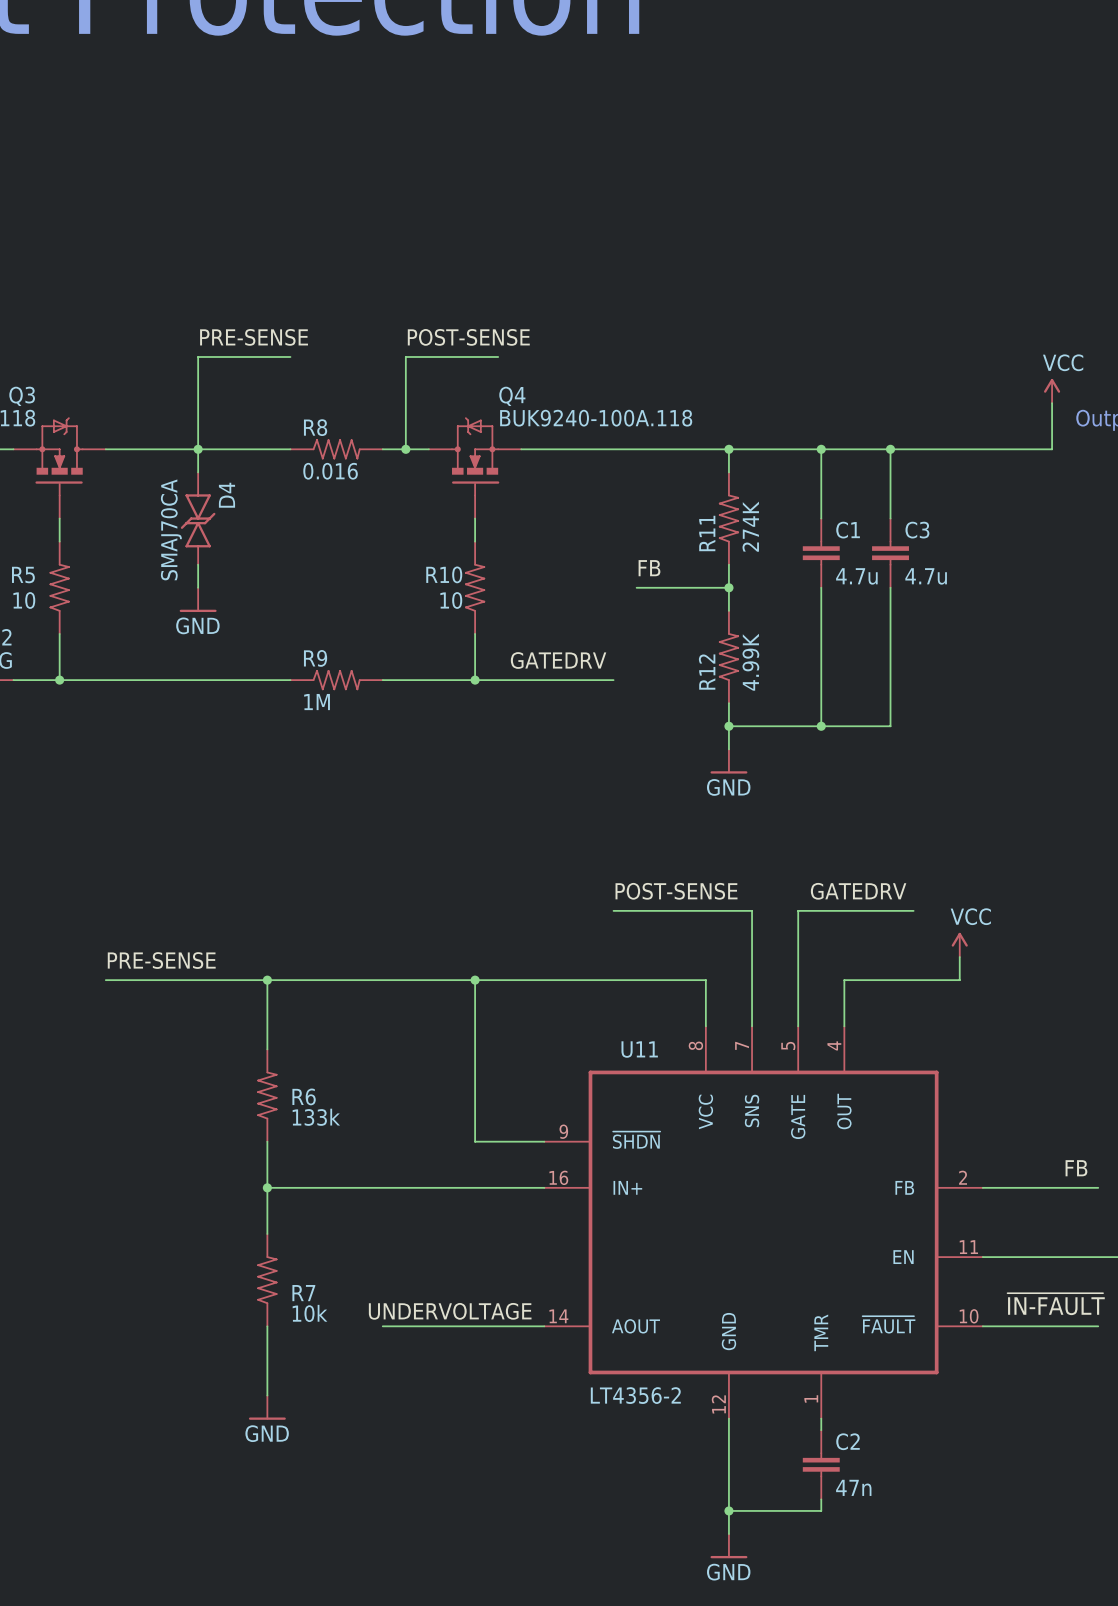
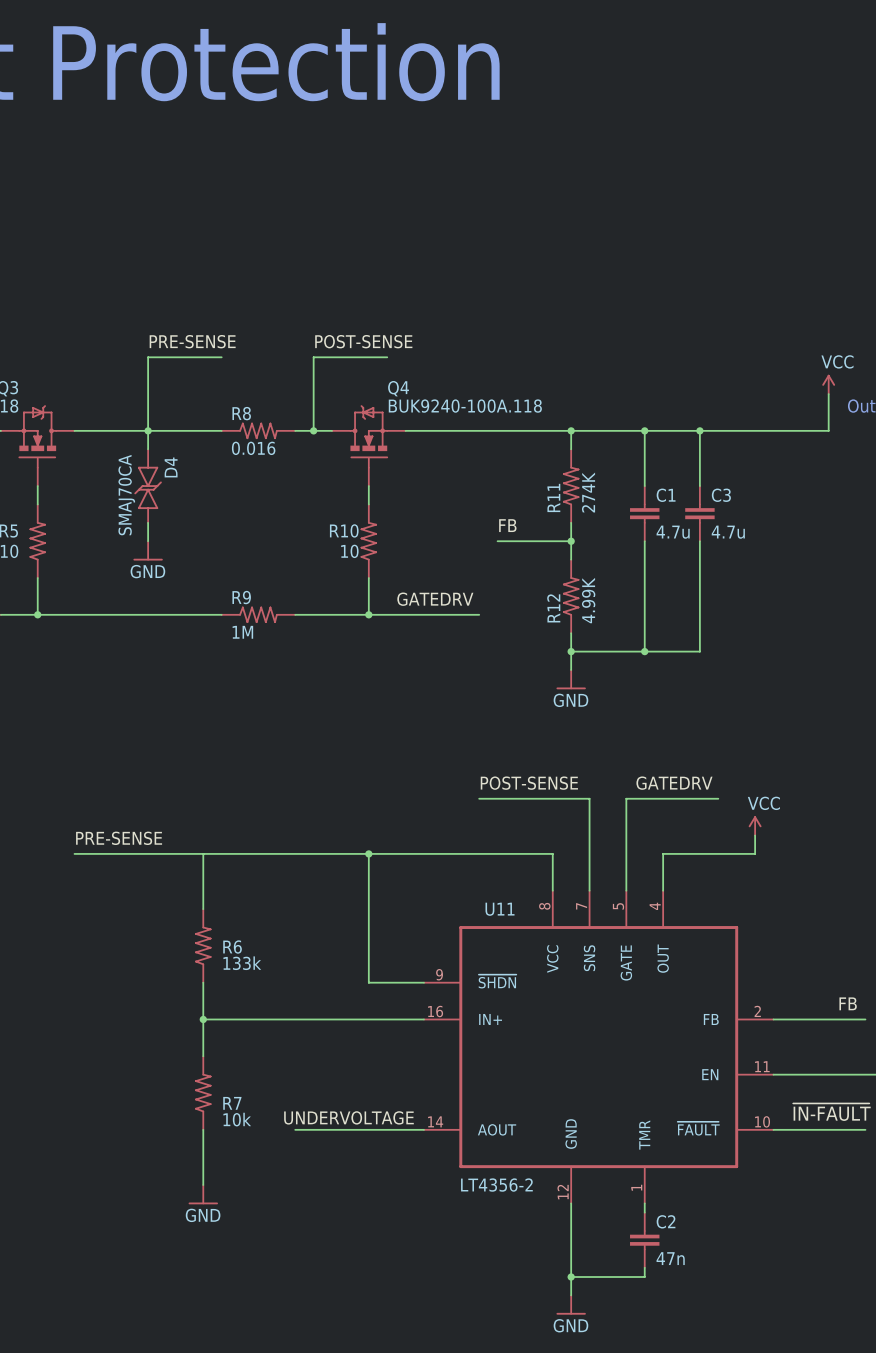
junction: (267, 980) -> none

